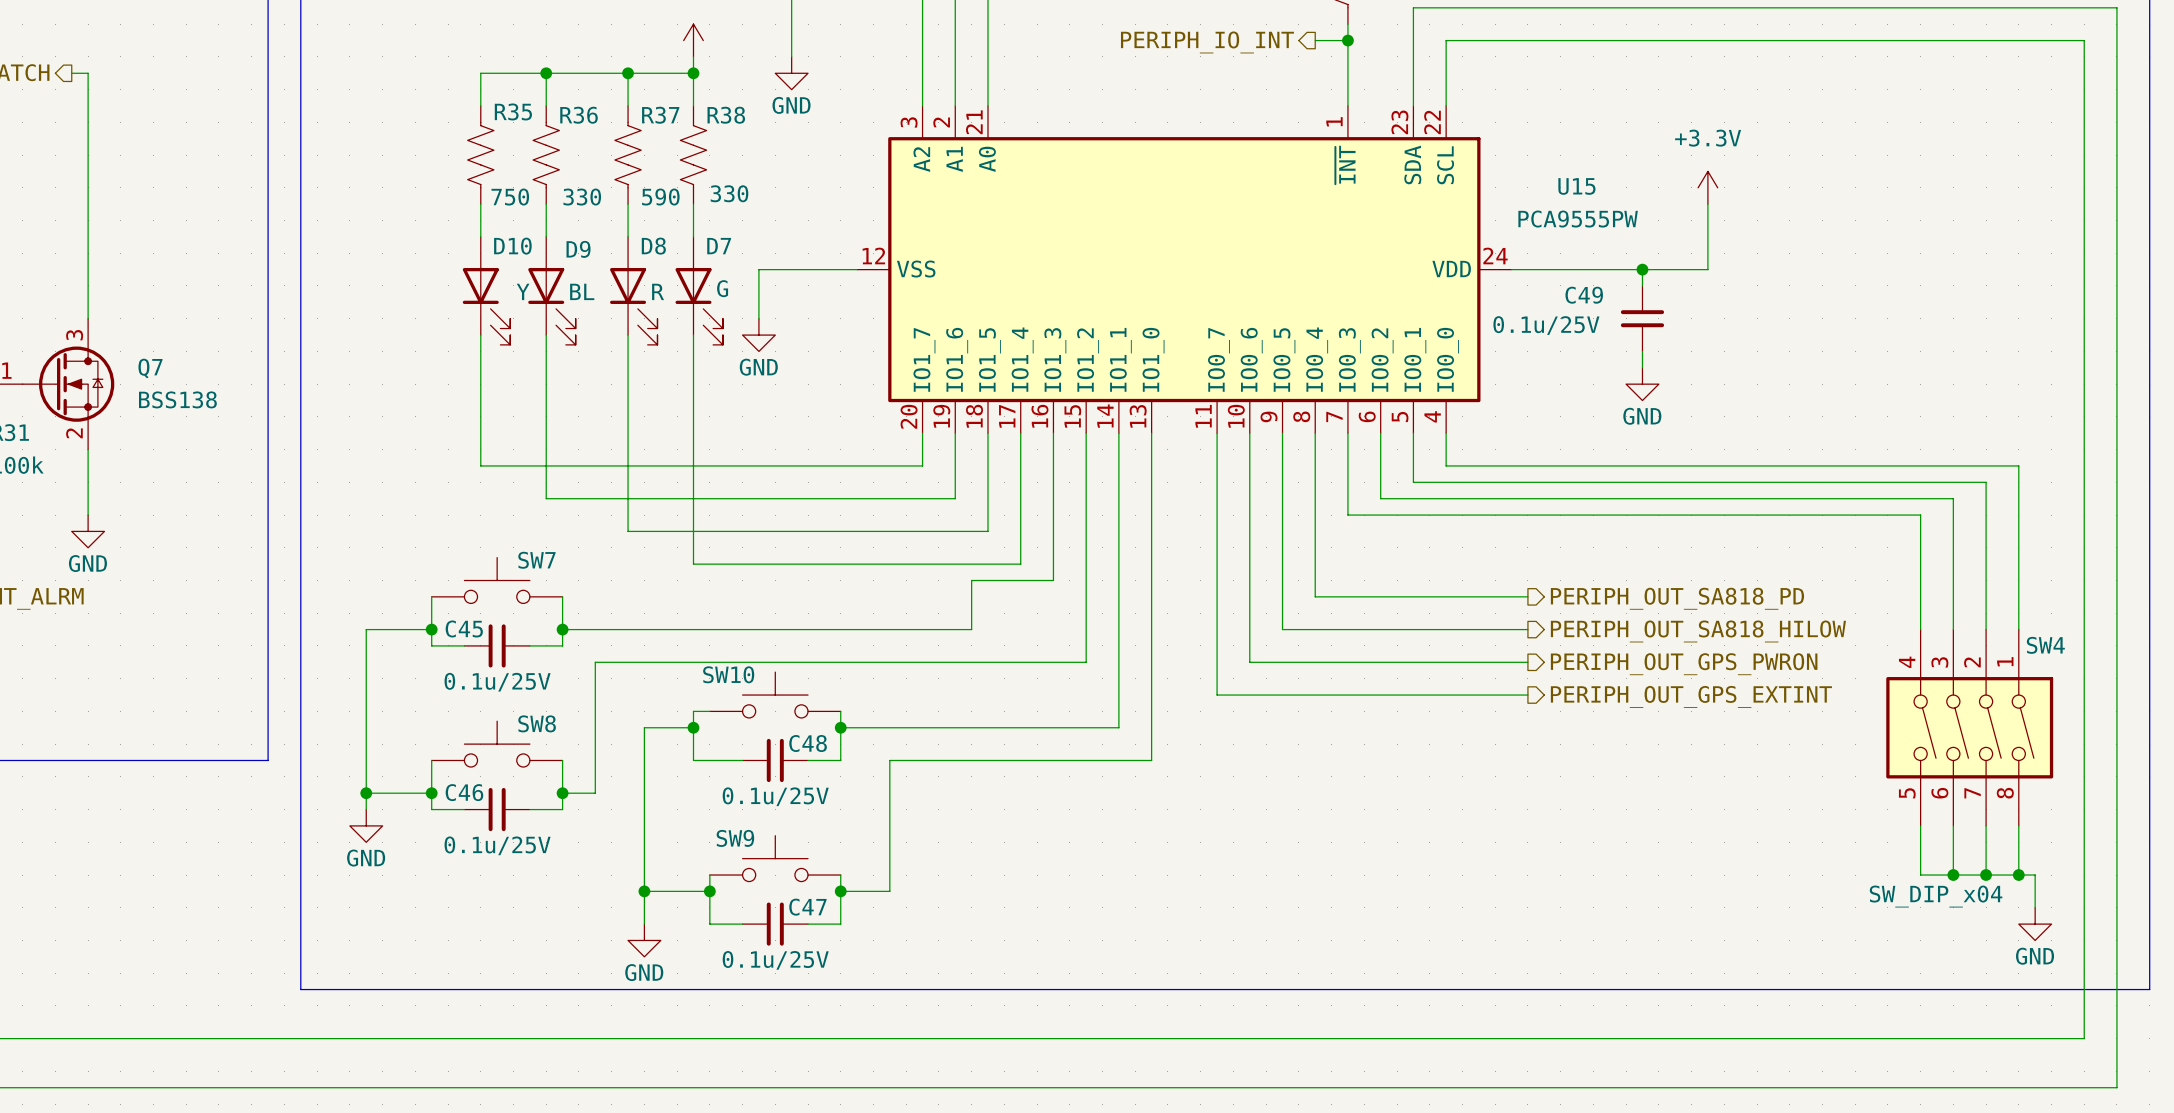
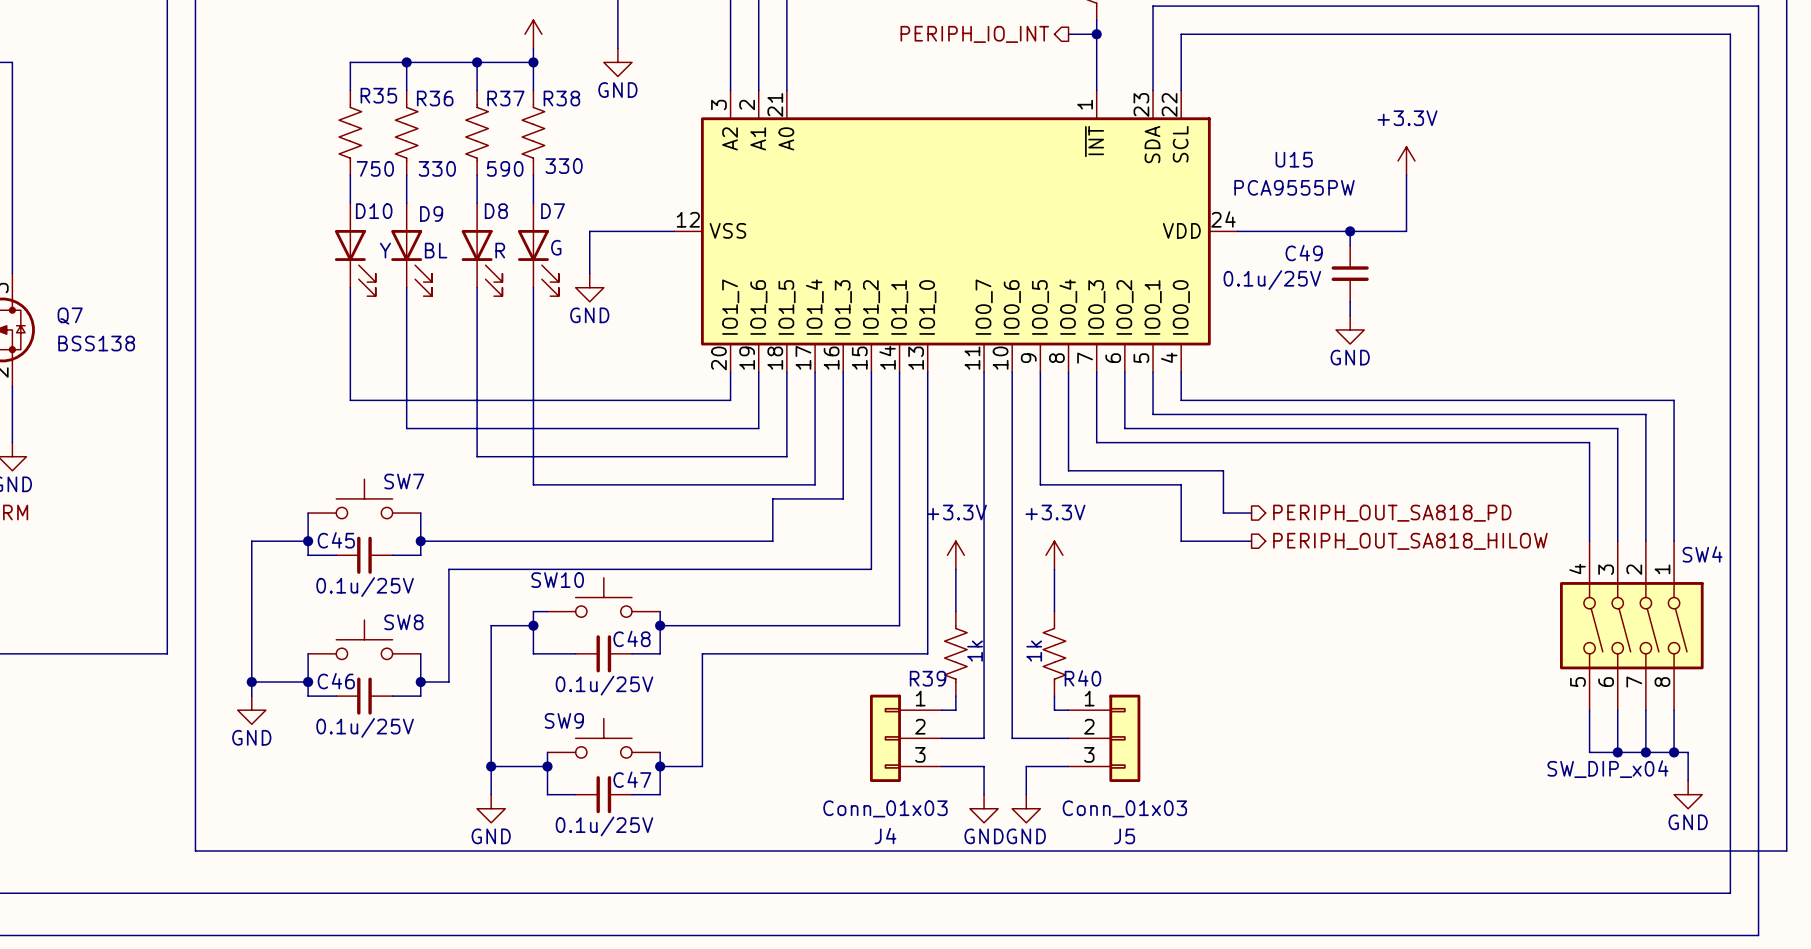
wire: (1315, 547) (1315, 596) (1495, 596) -> (1068, 470) (1223, 470) (1223, 513)
wire: (1282, 564) (1282, 629) (1446, 629) -> (1040, 484) (1181, 484) (1181, 541)
power symbol: none -> +3.3V (955, 555)
power symbol: none -> +3.3V (1054, 555)
wire: none -> (955, 569) (955, 611)
wire: (1249, 662) (1527, 662) -> (1012, 569) (1012, 738) (1068, 738)
wire: none -> (1054, 569) (1054, 611)
hierarchical label: PERIPH_OUT_GPS_PWRON (1684, 664) -> none
wire: (1217, 695) (1527, 695) -> (984, 597) (984, 738) (941, 738)
hierarchical label: PERIPH_OUT_GPS_EXTINT (1691, 696) -> none
R39: none -> 1k (955, 653)
R40: none -> 1k (1054, 653)
wire: none -> (955, 696) (955, 710) (941, 710)
wire: none -> (1054, 696) (1054, 710) (1068, 710)
J4: none -> Conn_01x03 (905, 738)
J5: none -> Conn_01x03 (1104, 738)
wire: none -> (941, 766) (984, 766) (984, 794)
wire: none -> (1068, 766) (1026, 766) (1026, 794)
power symbol: none -> GND (984, 808)
power symbol: none -> GND (1026, 808)

